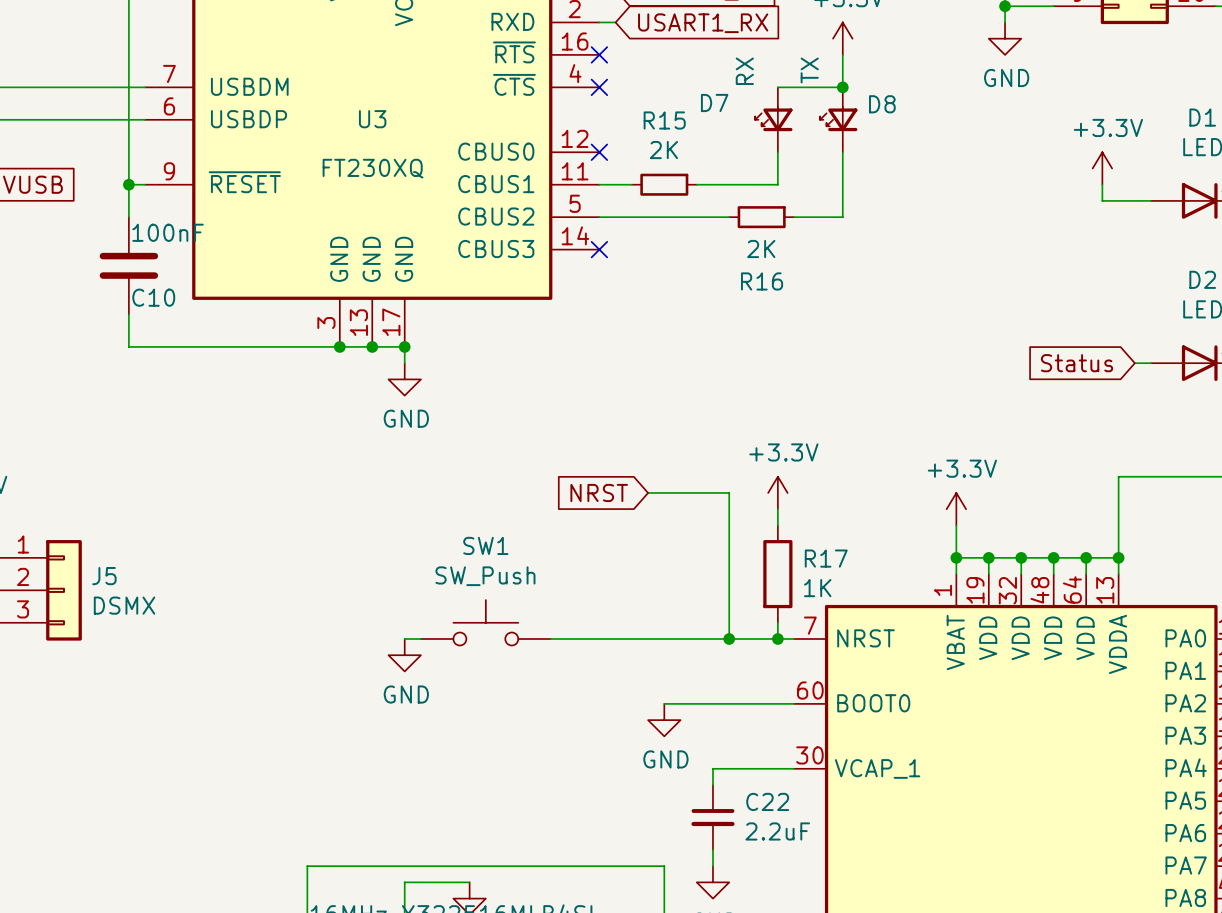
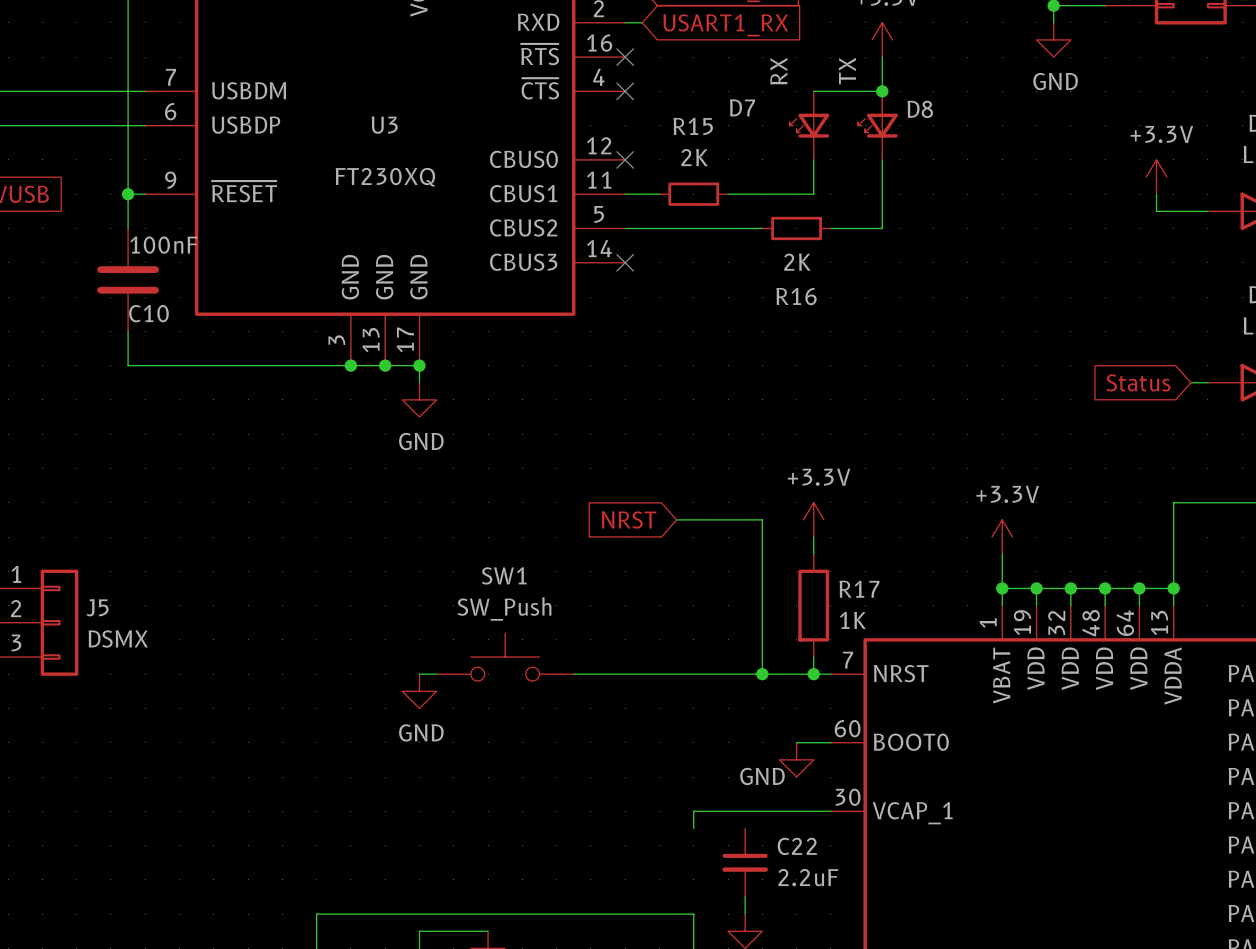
wire: (664, 703) (761, 703) -> none
power symbol position: GND (664, 720) -> GND (796, 759)
power symbol text position: GND (665, 759) -> GND (762, 776)
wire: (712, 768) (712, 785) -> (745, 811) (693, 811) (693, 828)

